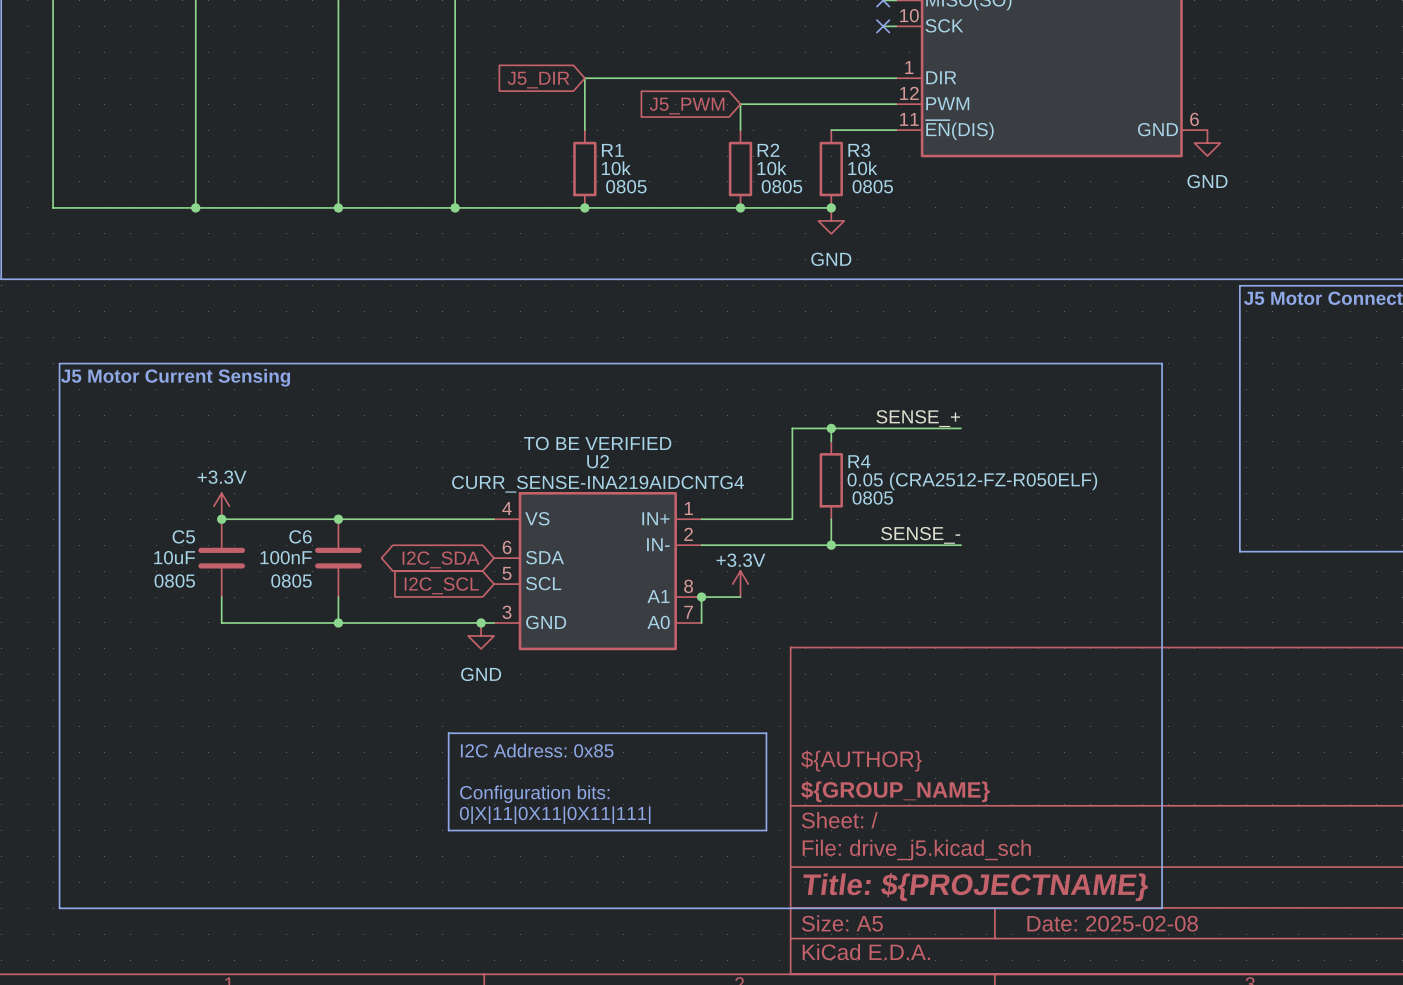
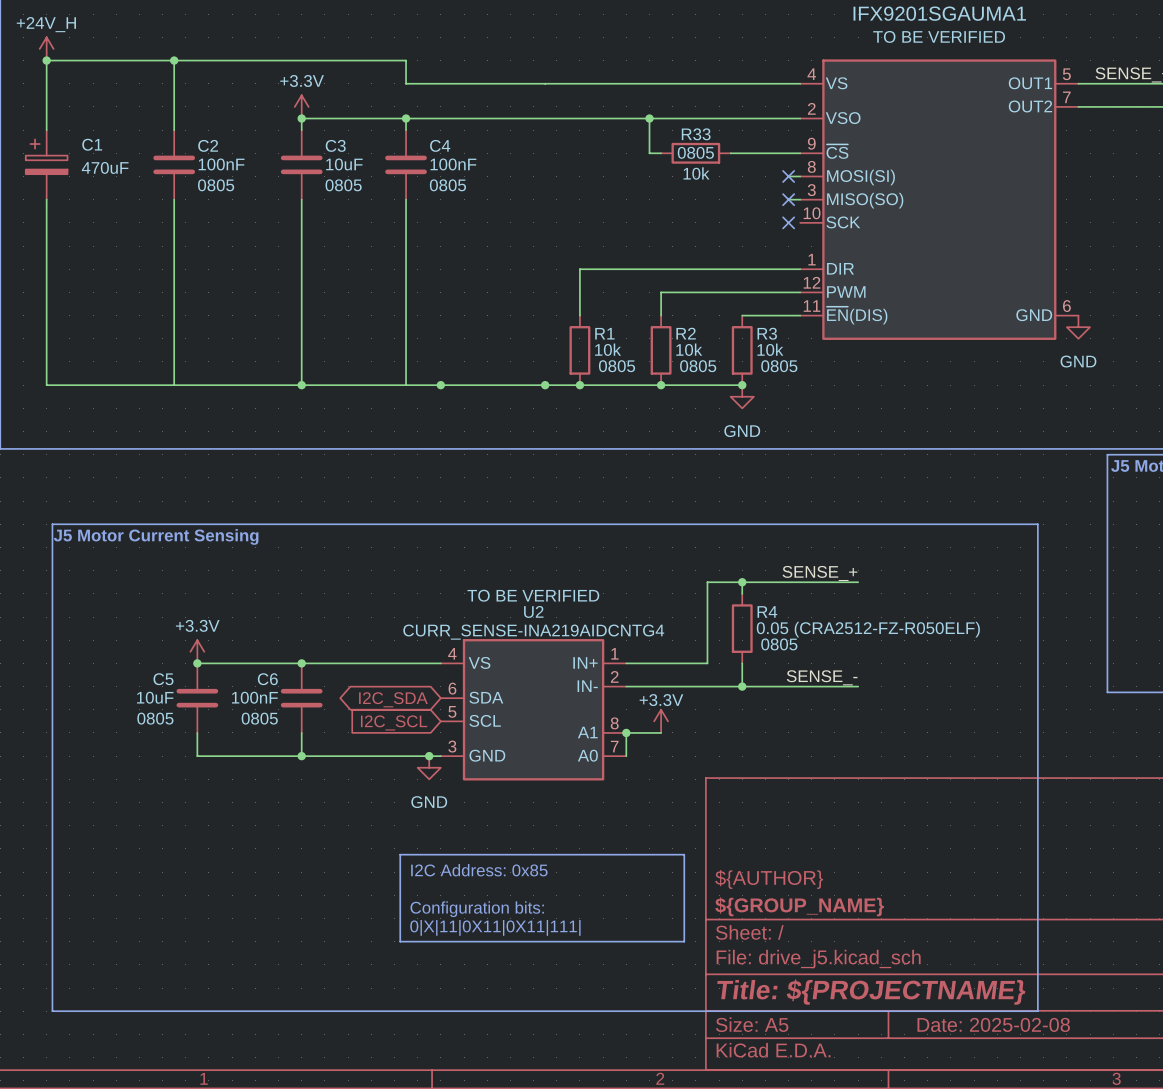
wire: (883, 26) (896, 26) -> none
wire: (649, 78) (584, 78) (584, 130) -> (579, 269) (579, 315)
global label: J5_DIR (538, 80) -> none
global label: J5_PWM (687, 106) -> none
R1 position: (584, 169) -> (579, 350)
junction: (195, 207) -> none
junction position: (455, 207) -> (440, 385)
junction position: (584, 207) -> (545, 385)
junction: none -> (579, 385)

